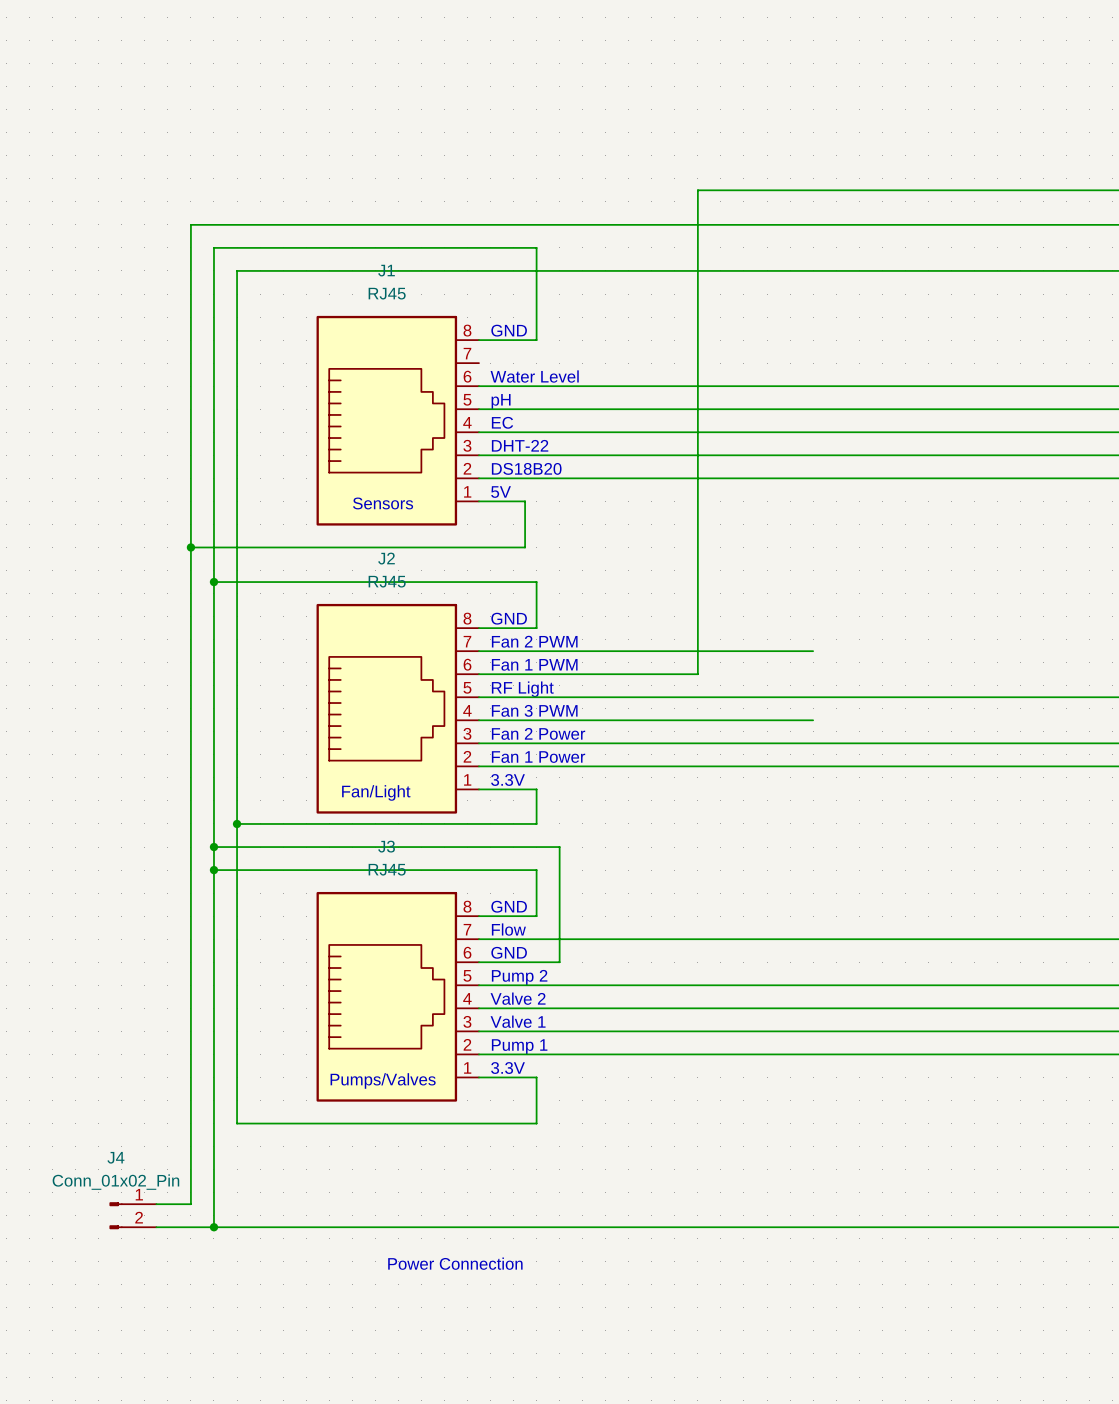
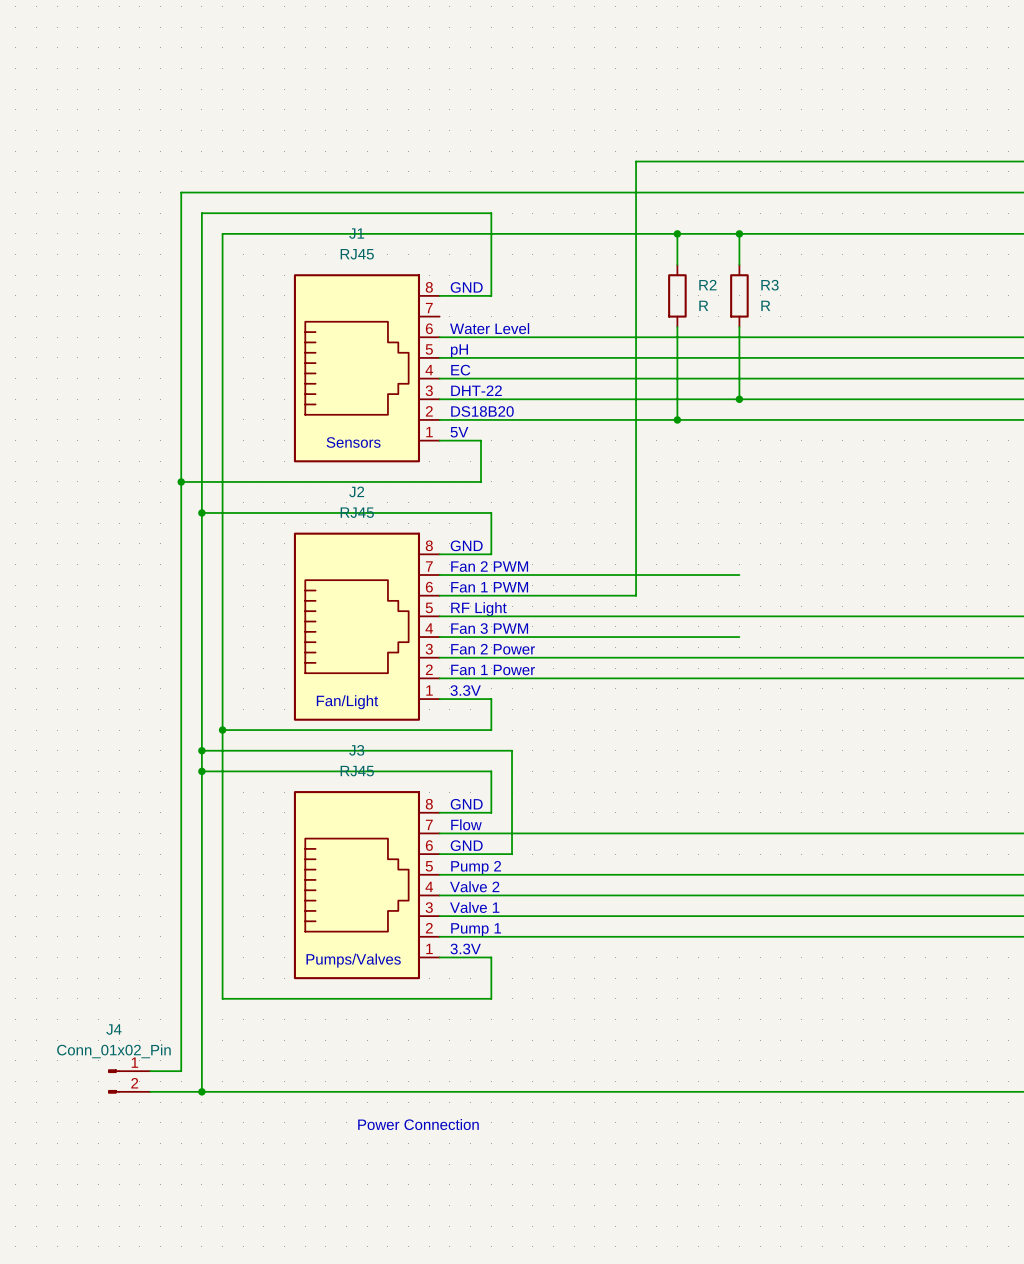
wire: none -> (677, 233) (677, 264)
junction: none -> (677, 233)
wire: none -> (739, 233) (739, 264)
junction: none -> (739, 233)
R2: none -> R (677, 295)
R3: none -> R (739, 295)
wire: none -> (677, 326) (677, 419)
wire: none -> (739, 326) (739, 399)
junction: none -> (739, 399)
junction: none -> (677, 419)

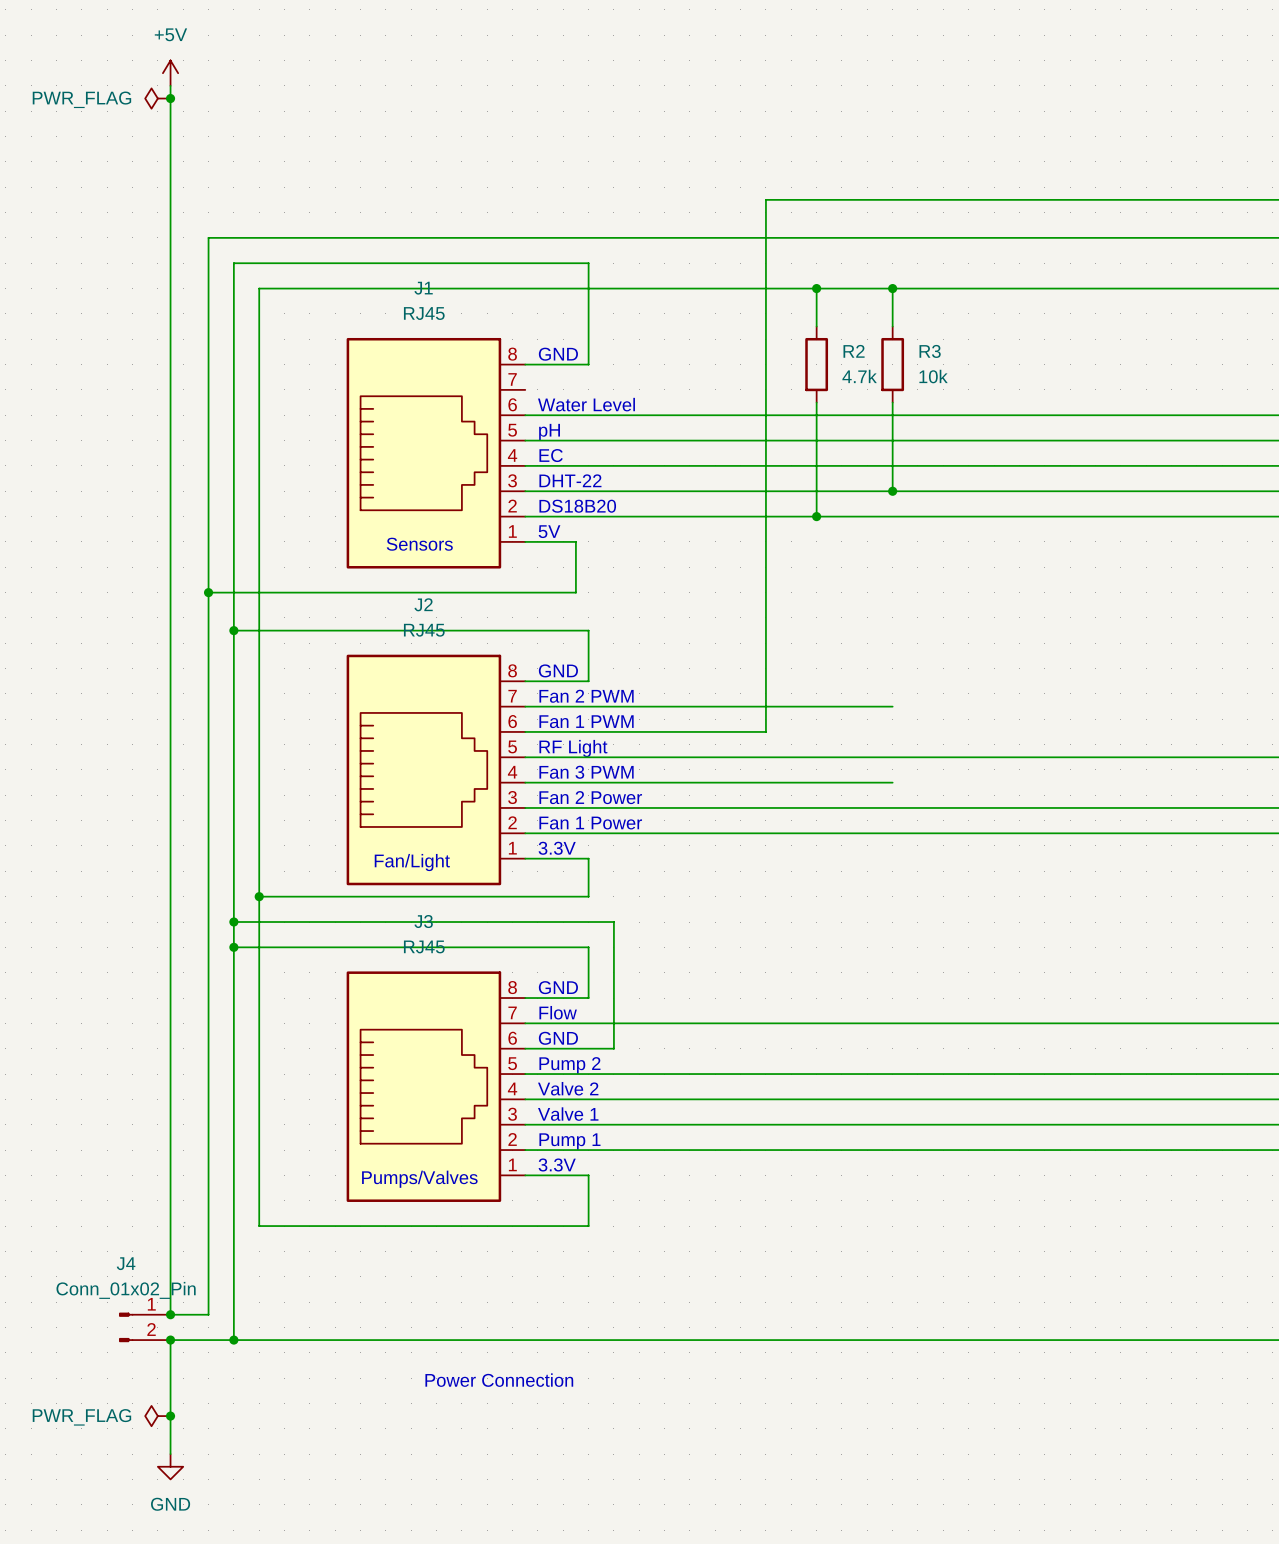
power symbol: none -> +5V (170, 73)
wire: none -> (170, 85) (170, 1314)
power symbol: none -> PWR_FLAG (157, 98)
junction: none -> (170, 98)
R2 value: R (703, 305) -> 4.7k (859, 376)
R3 value: R (765, 305) -> 10k (933, 376)
junction: none -> (170, 1314)
wire: none -> (170, 1340) (170, 1454)
junction: none -> (170, 1340)
power symbol: none -> PWR_FLAG (157, 1416)
junction: none -> (170, 1416)
power symbol: none -> GND (170, 1466)

